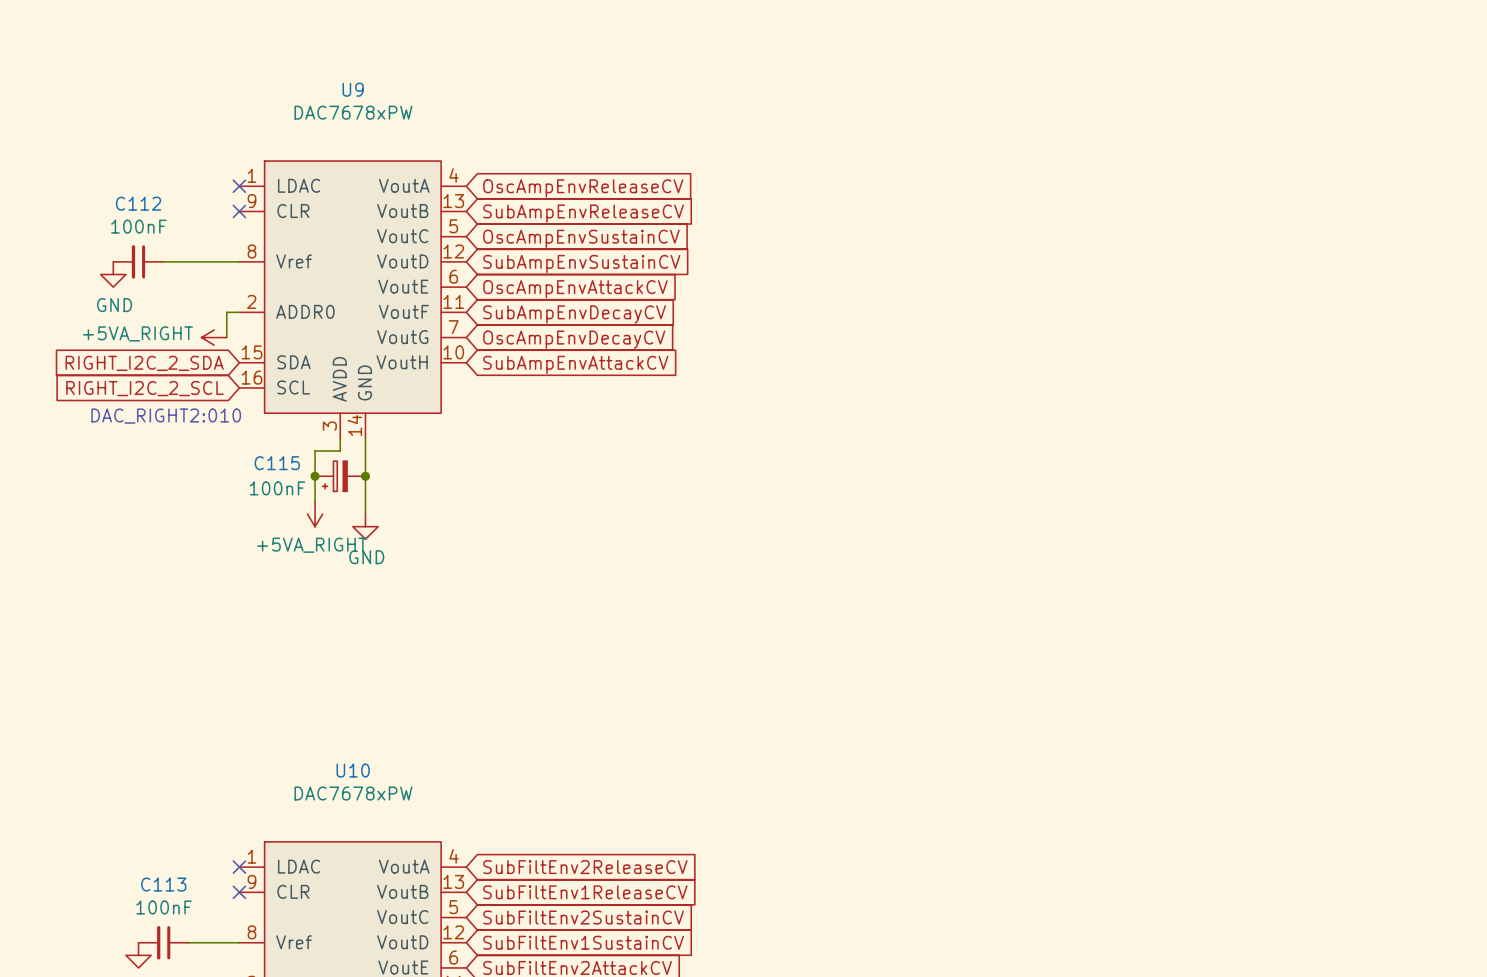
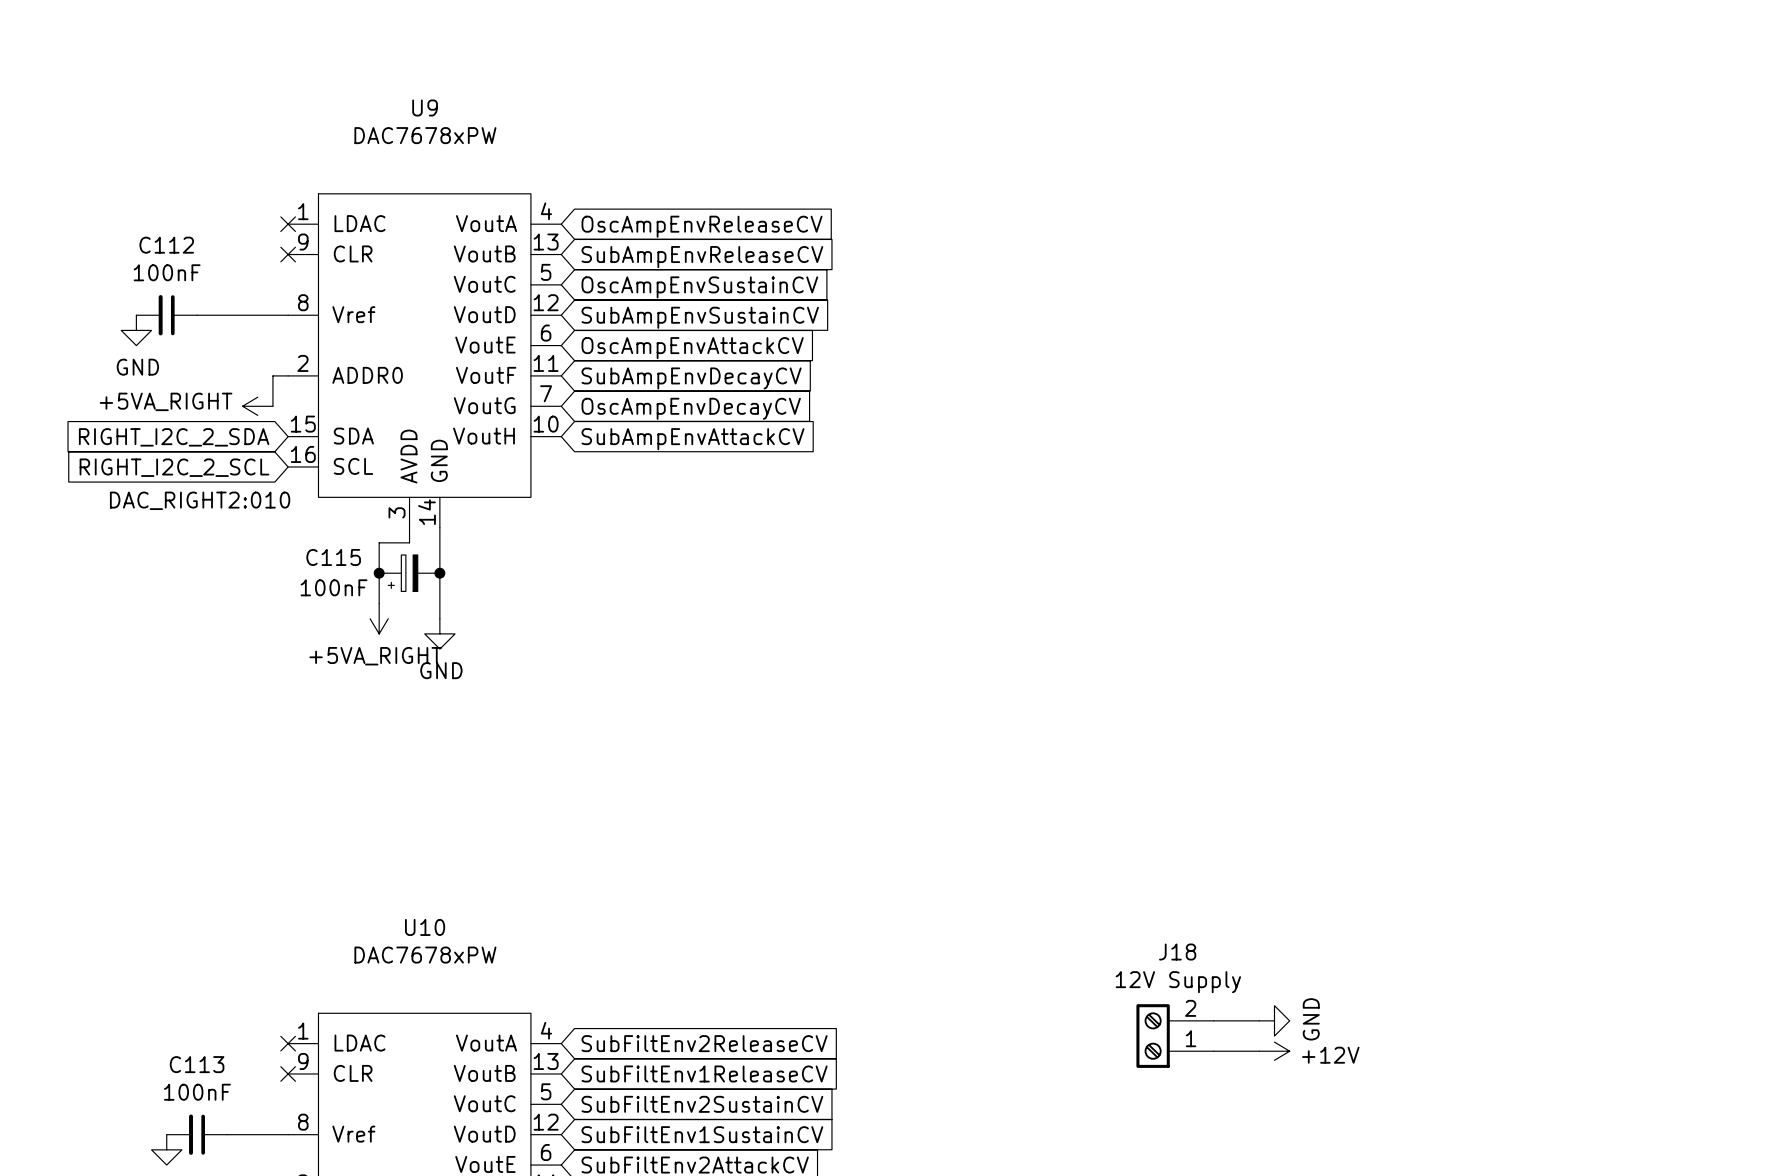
wire: none -> (1213, 1020) (1259, 1020)
power symbol: none -> GND (1274, 1020)
J18: none -> 12V Supply (1175, 1036)
wire: none -> (1213, 1051) (1259, 1051)
power symbol: none -> +12V (1274, 1051)

